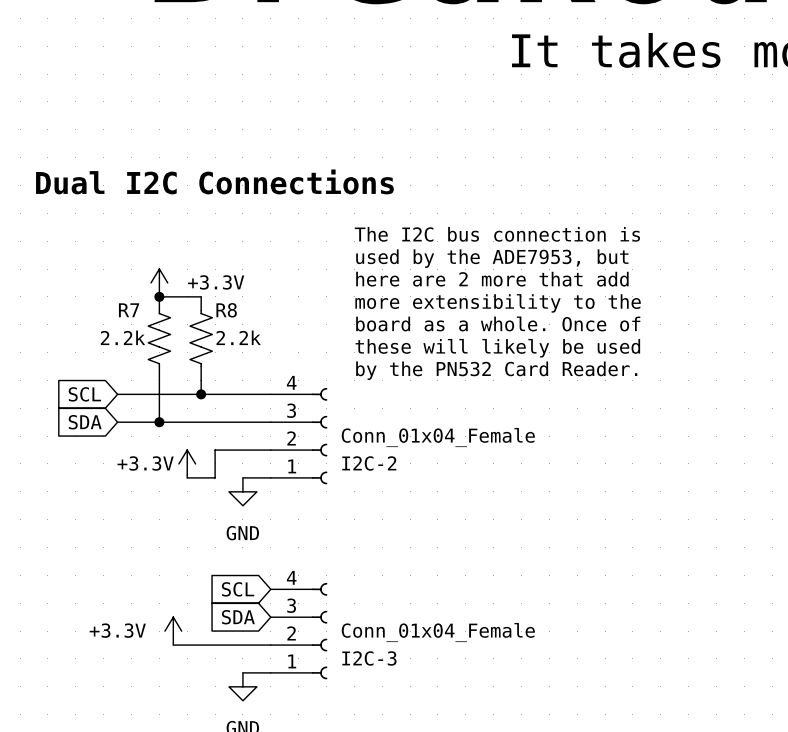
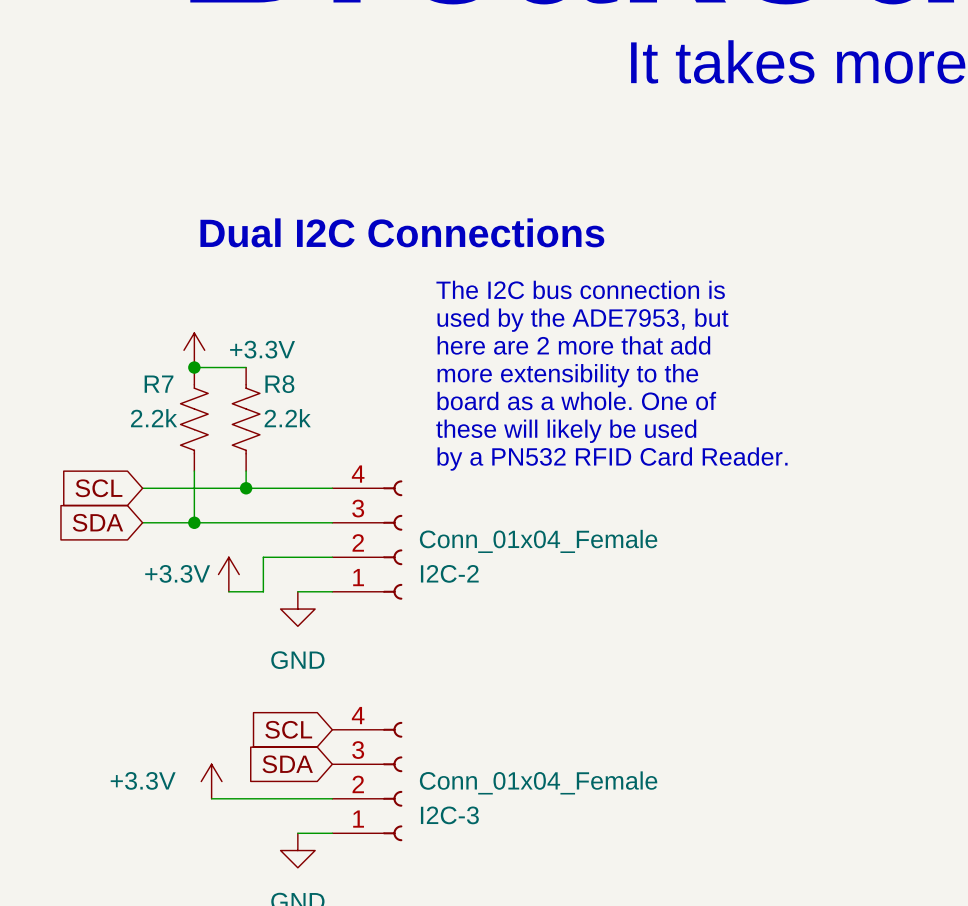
text position: Dual I2C Connections (214, 181) -> Dual I2C Connections (402, 232)
text: board as a whole. Once of (498, 323) -> board as a whole. One of (576, 401)
text: by the PN532 Card Reader. (496, 370) -> by a PN532 RFID Card Reader. (612, 459)

